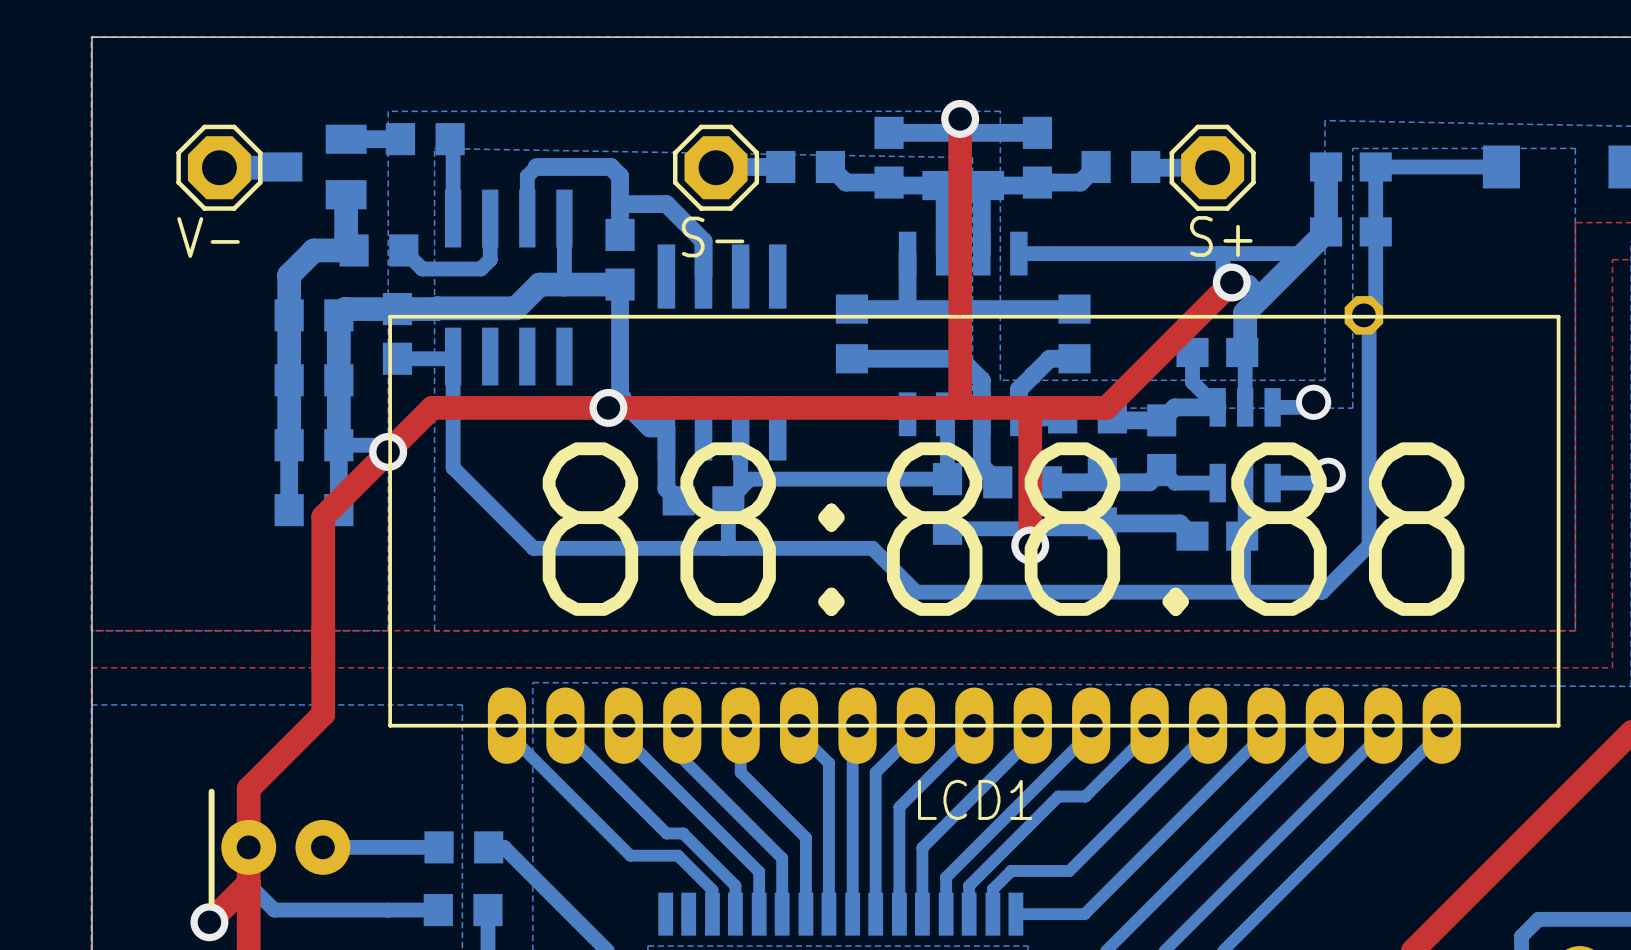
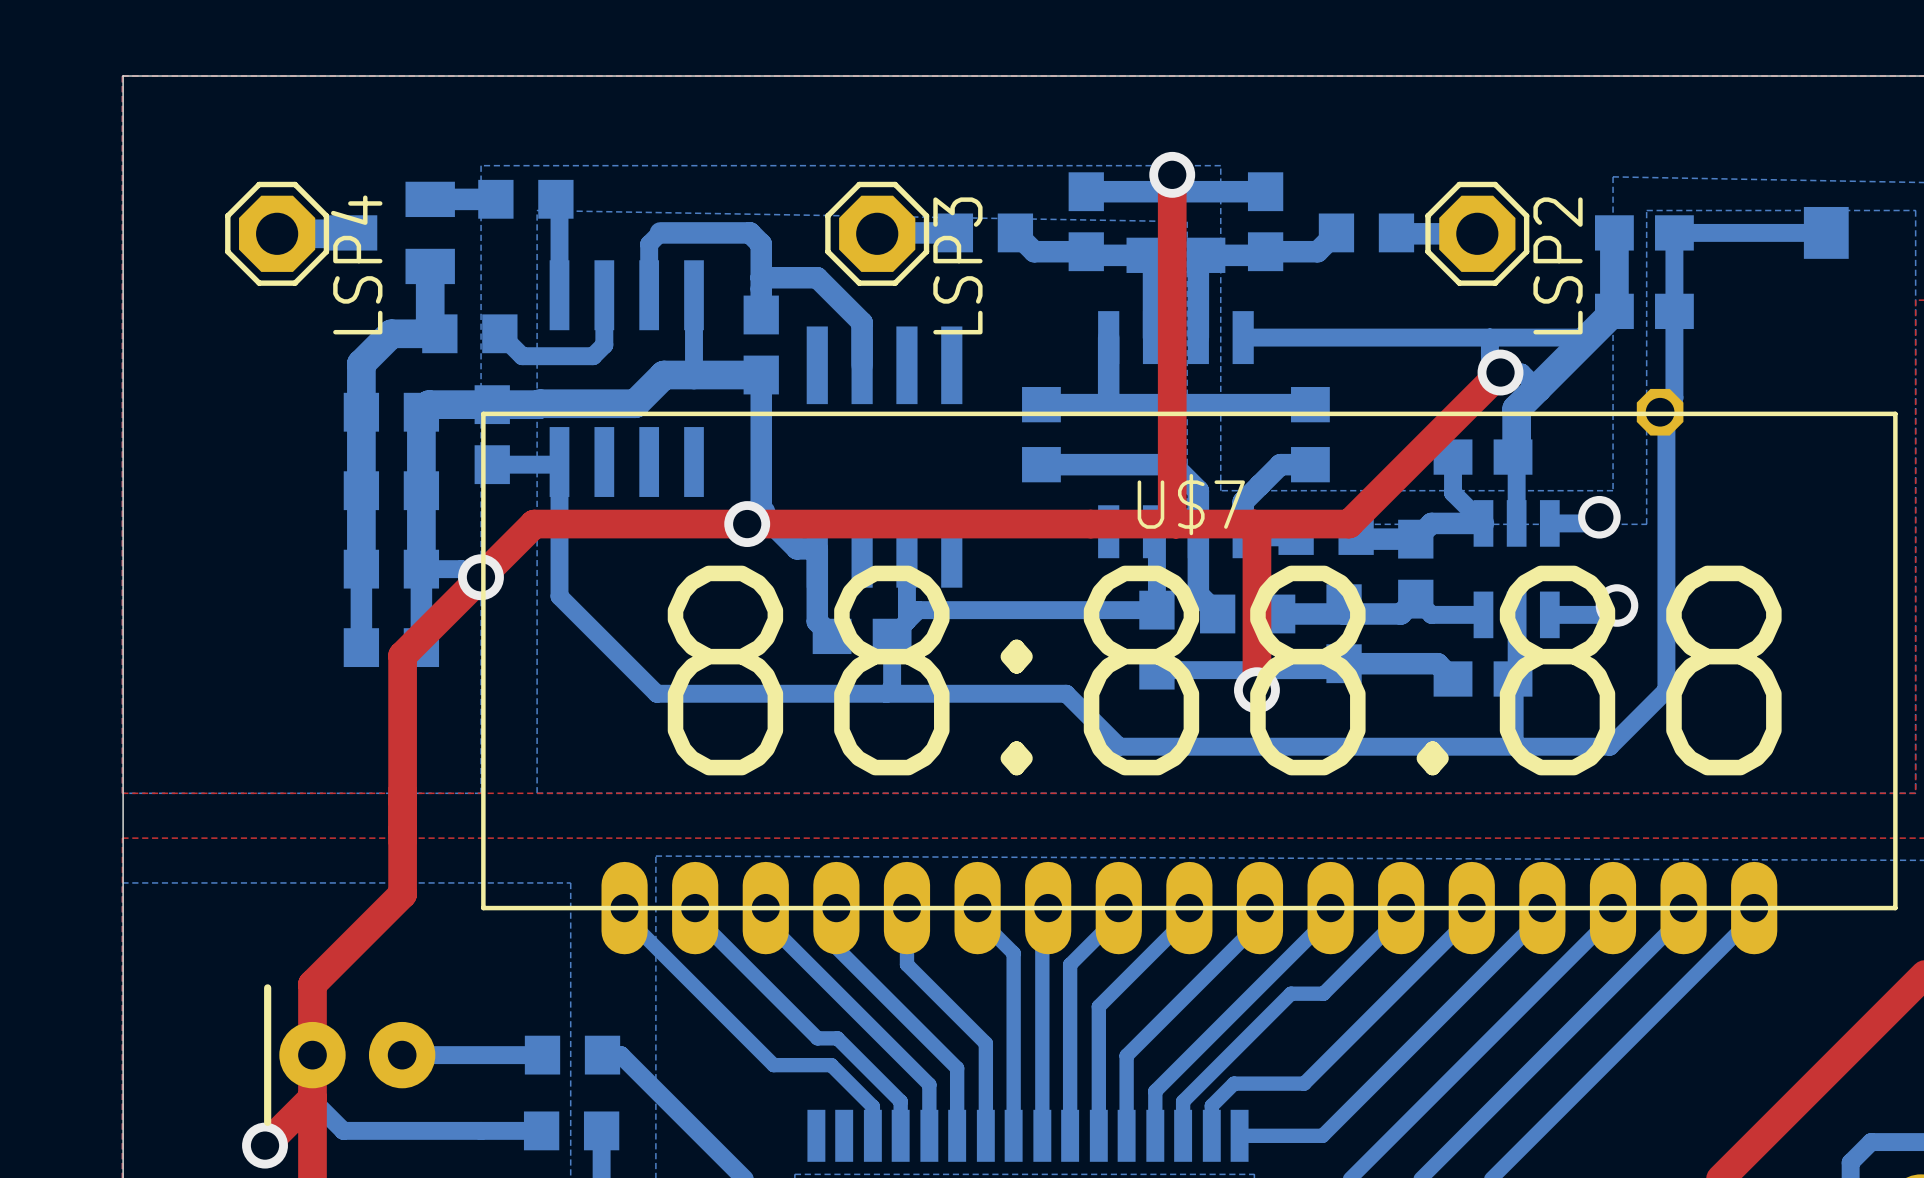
S- name: S- (713, 236) -> LSP3 (957, 265)
S+ name: S+ (1221, 236) -> LSP2 (1558, 265)
V- name: V- (208, 237) -> LSP4 (356, 264)
LCD1 name: LCD1 (975, 799) -> U$7 (1191, 504)

